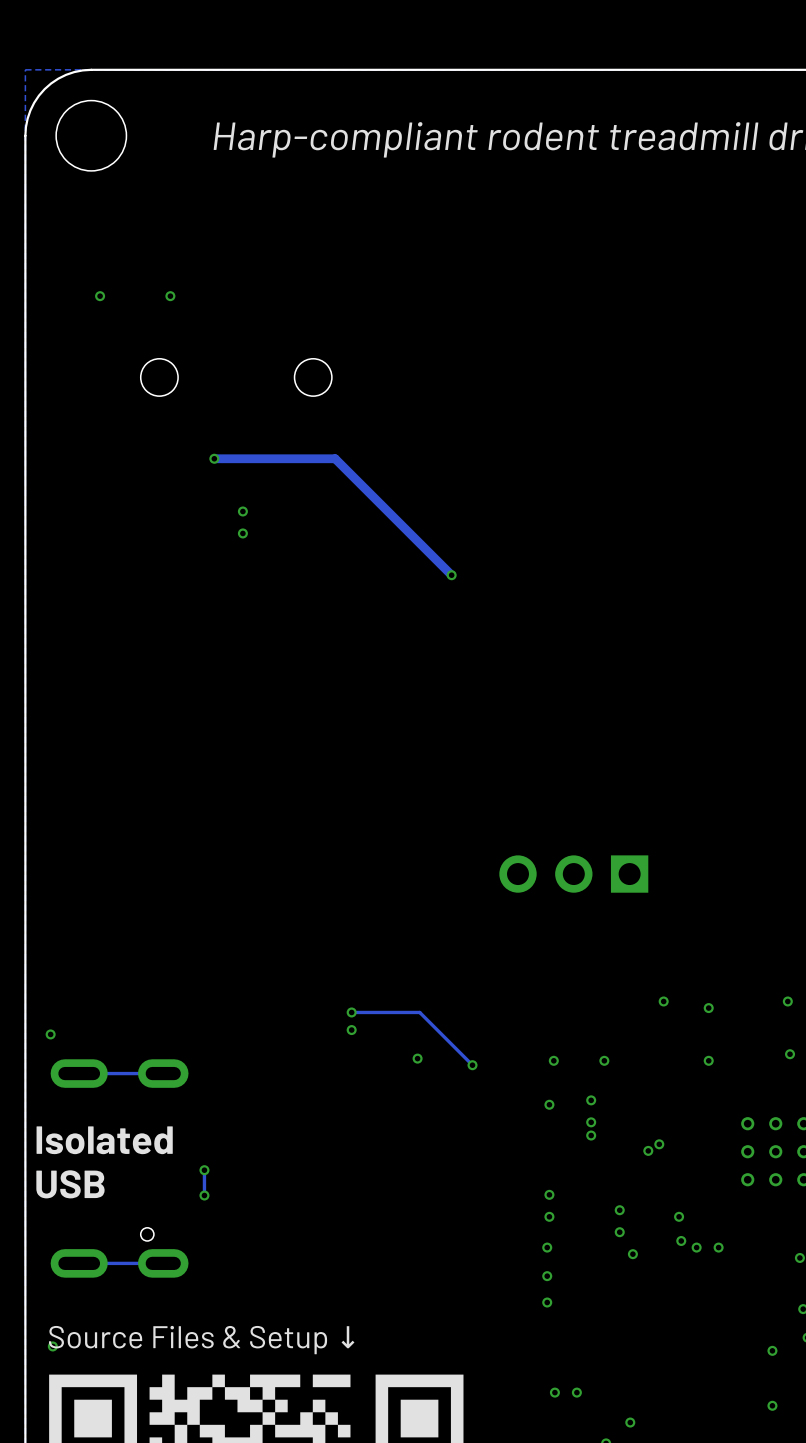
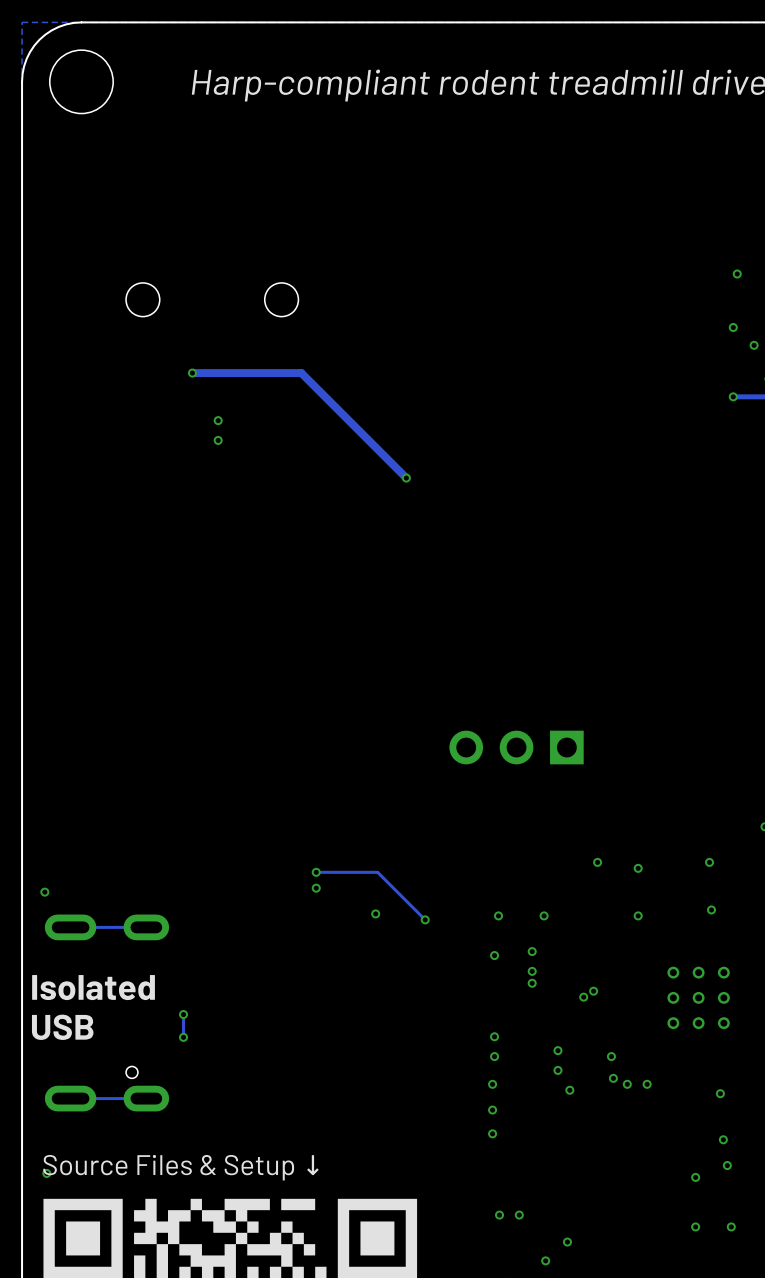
via: (100, 296) -> none
via: (170, 296) -> none

